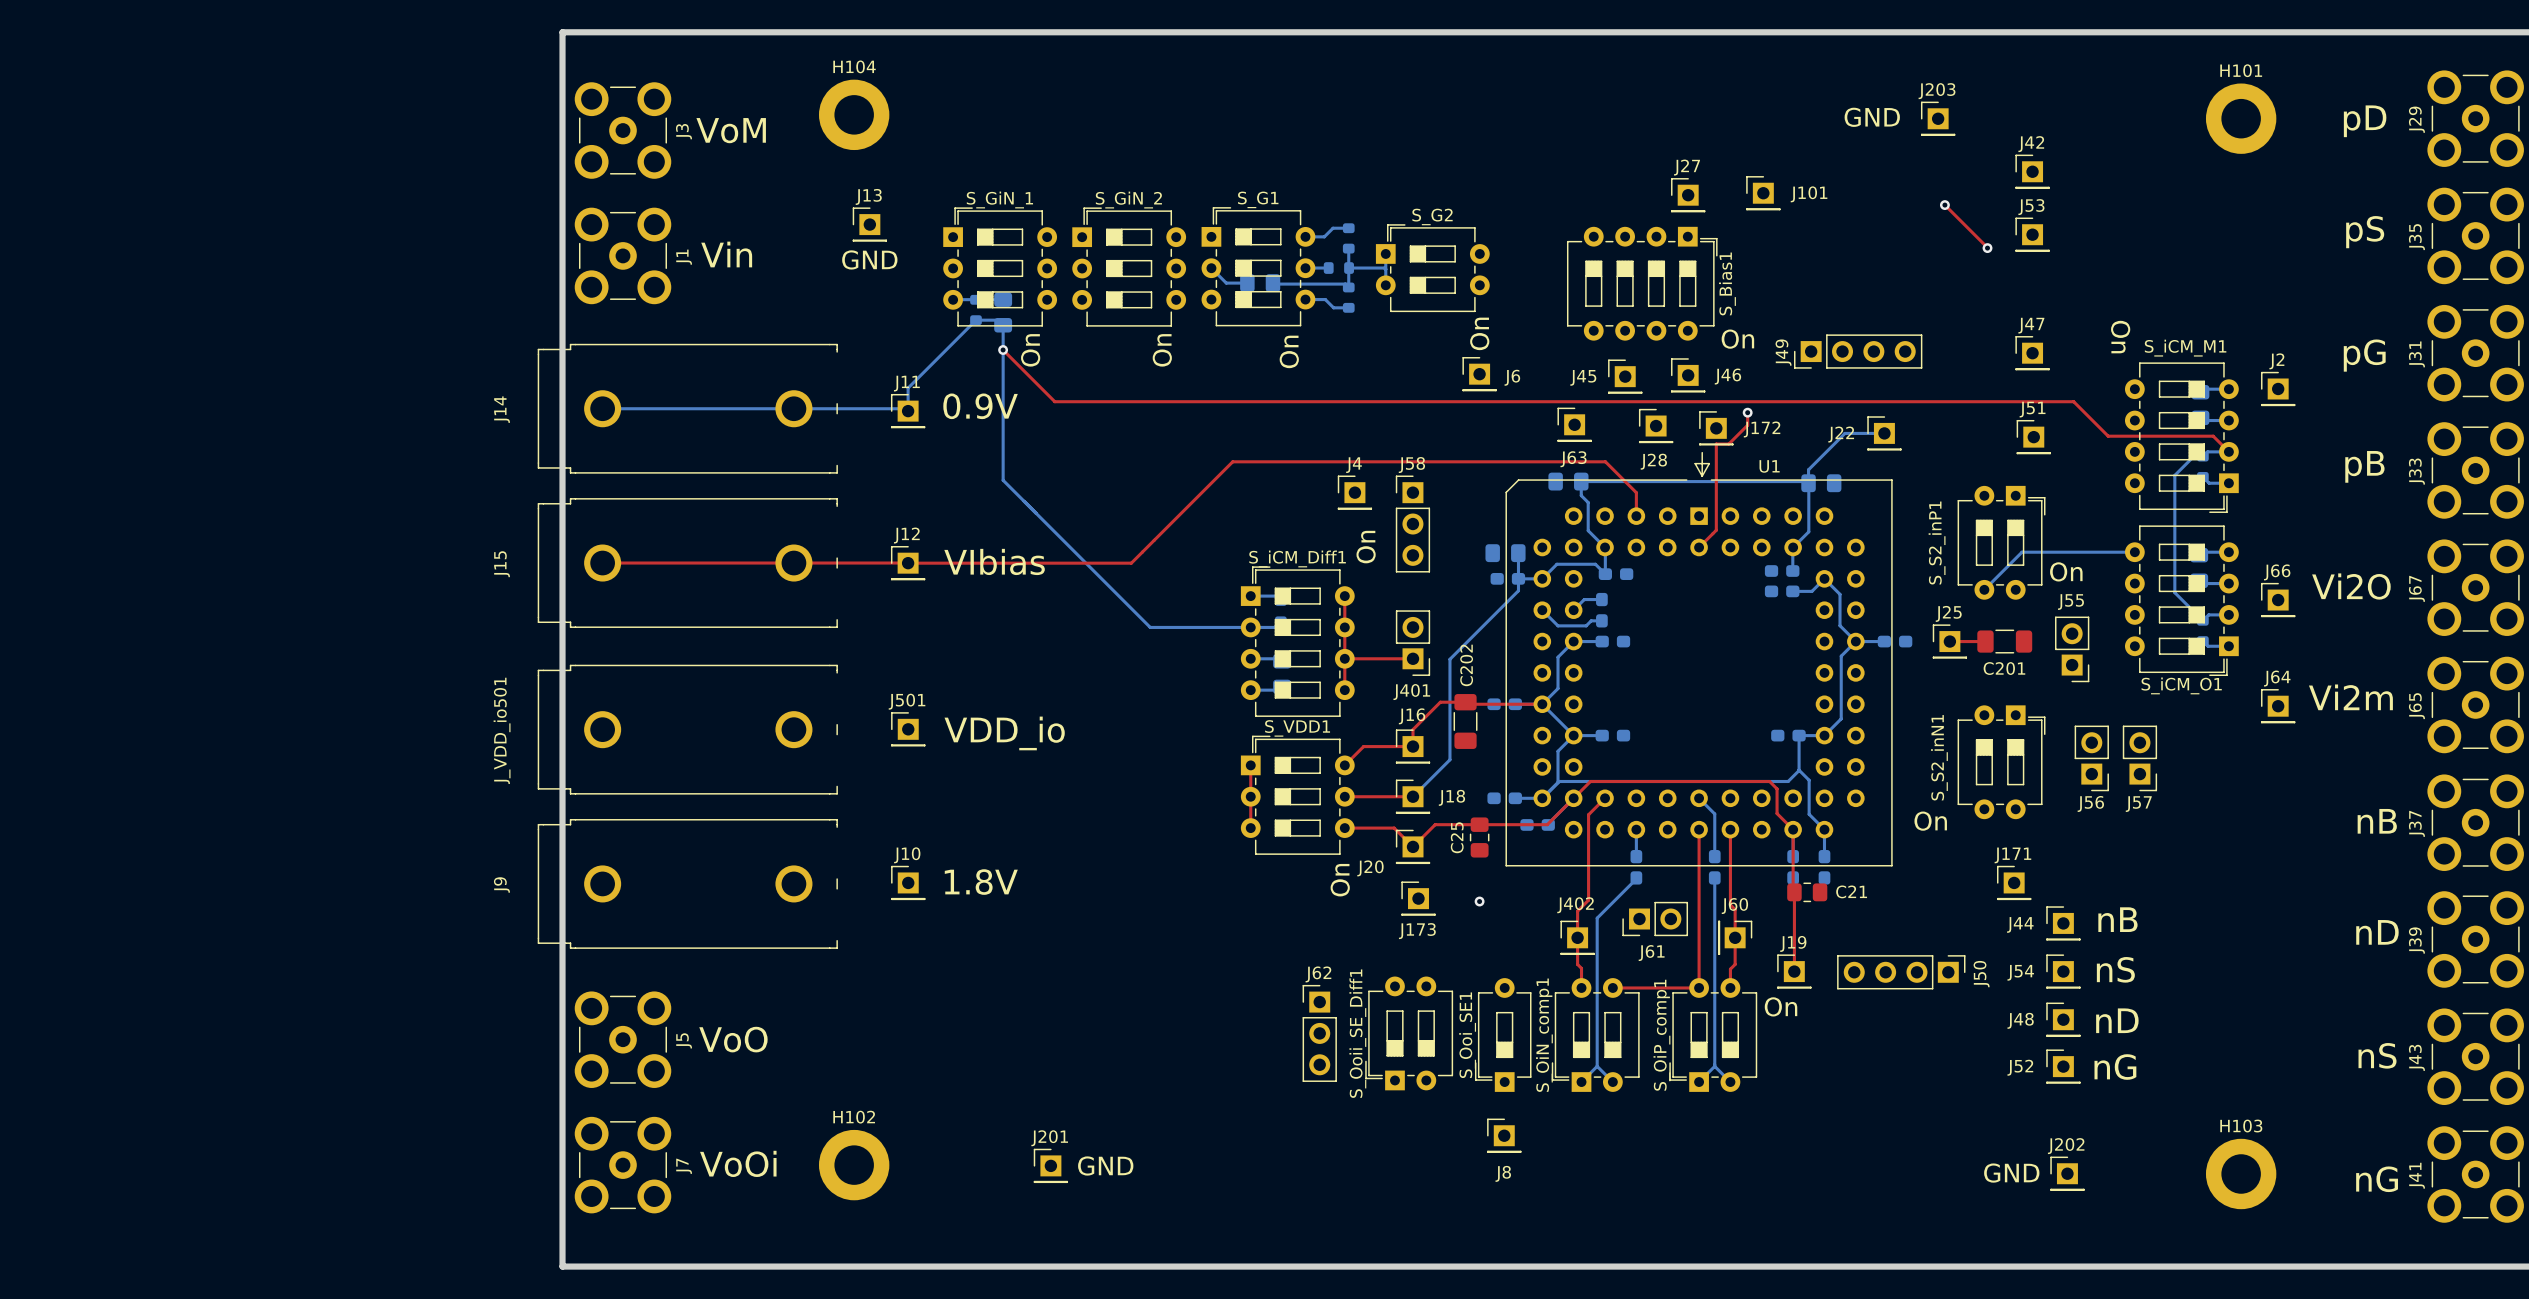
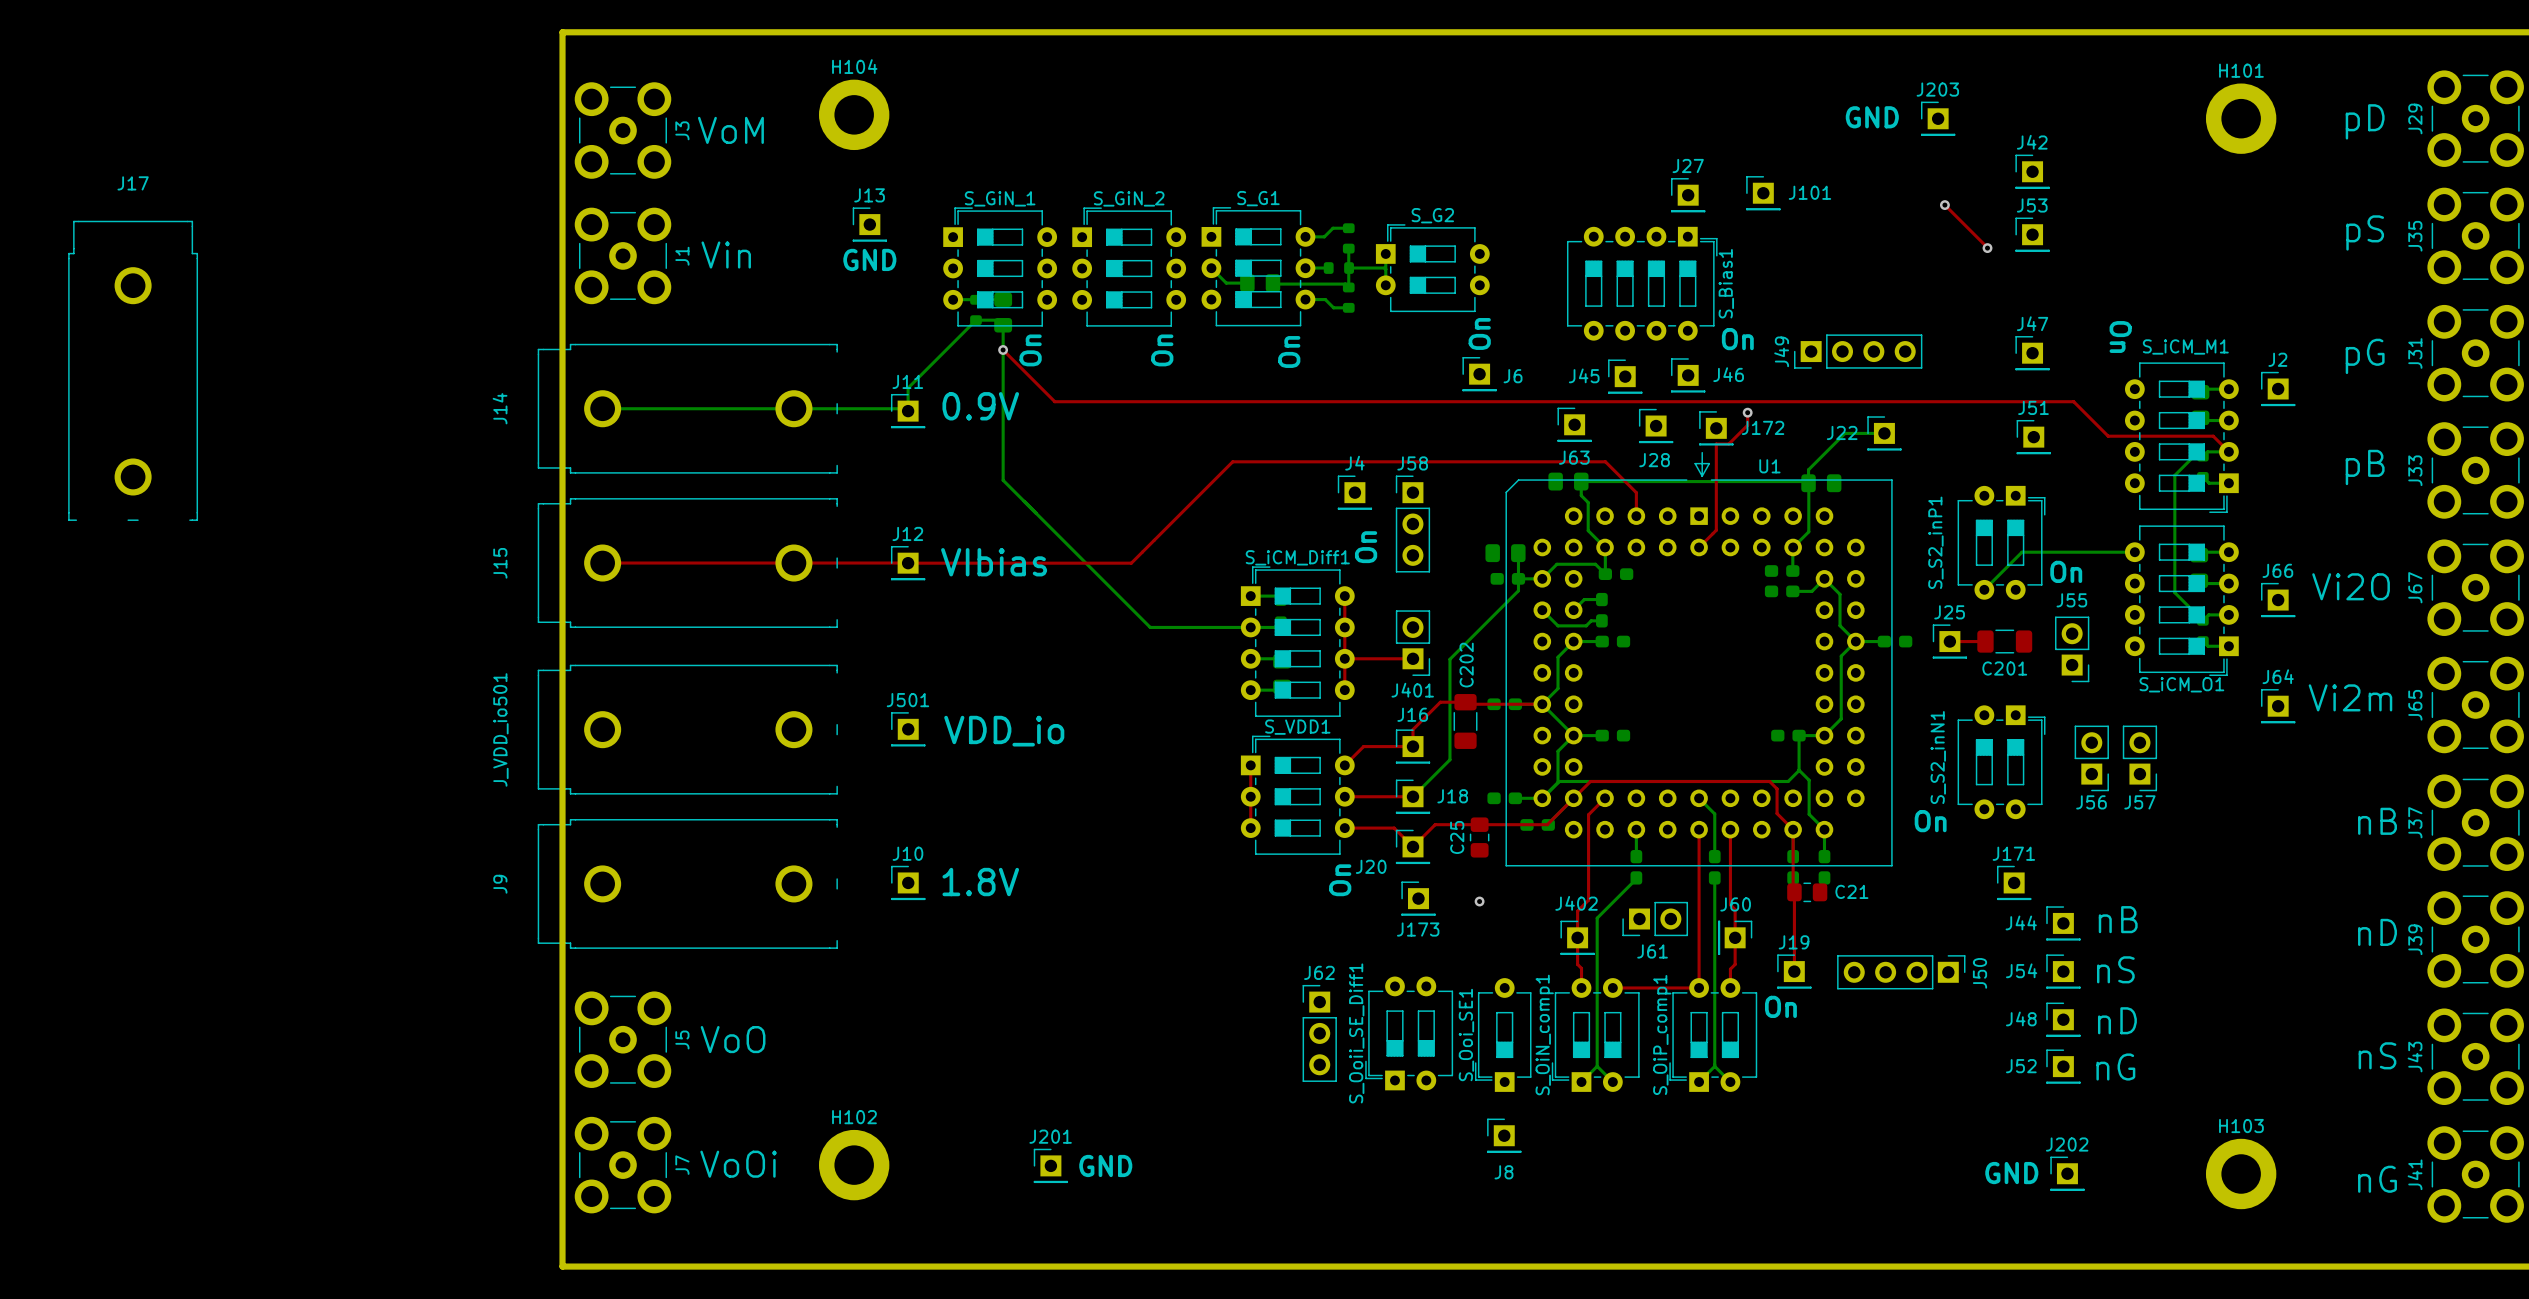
J17: none -> (133, 370)

